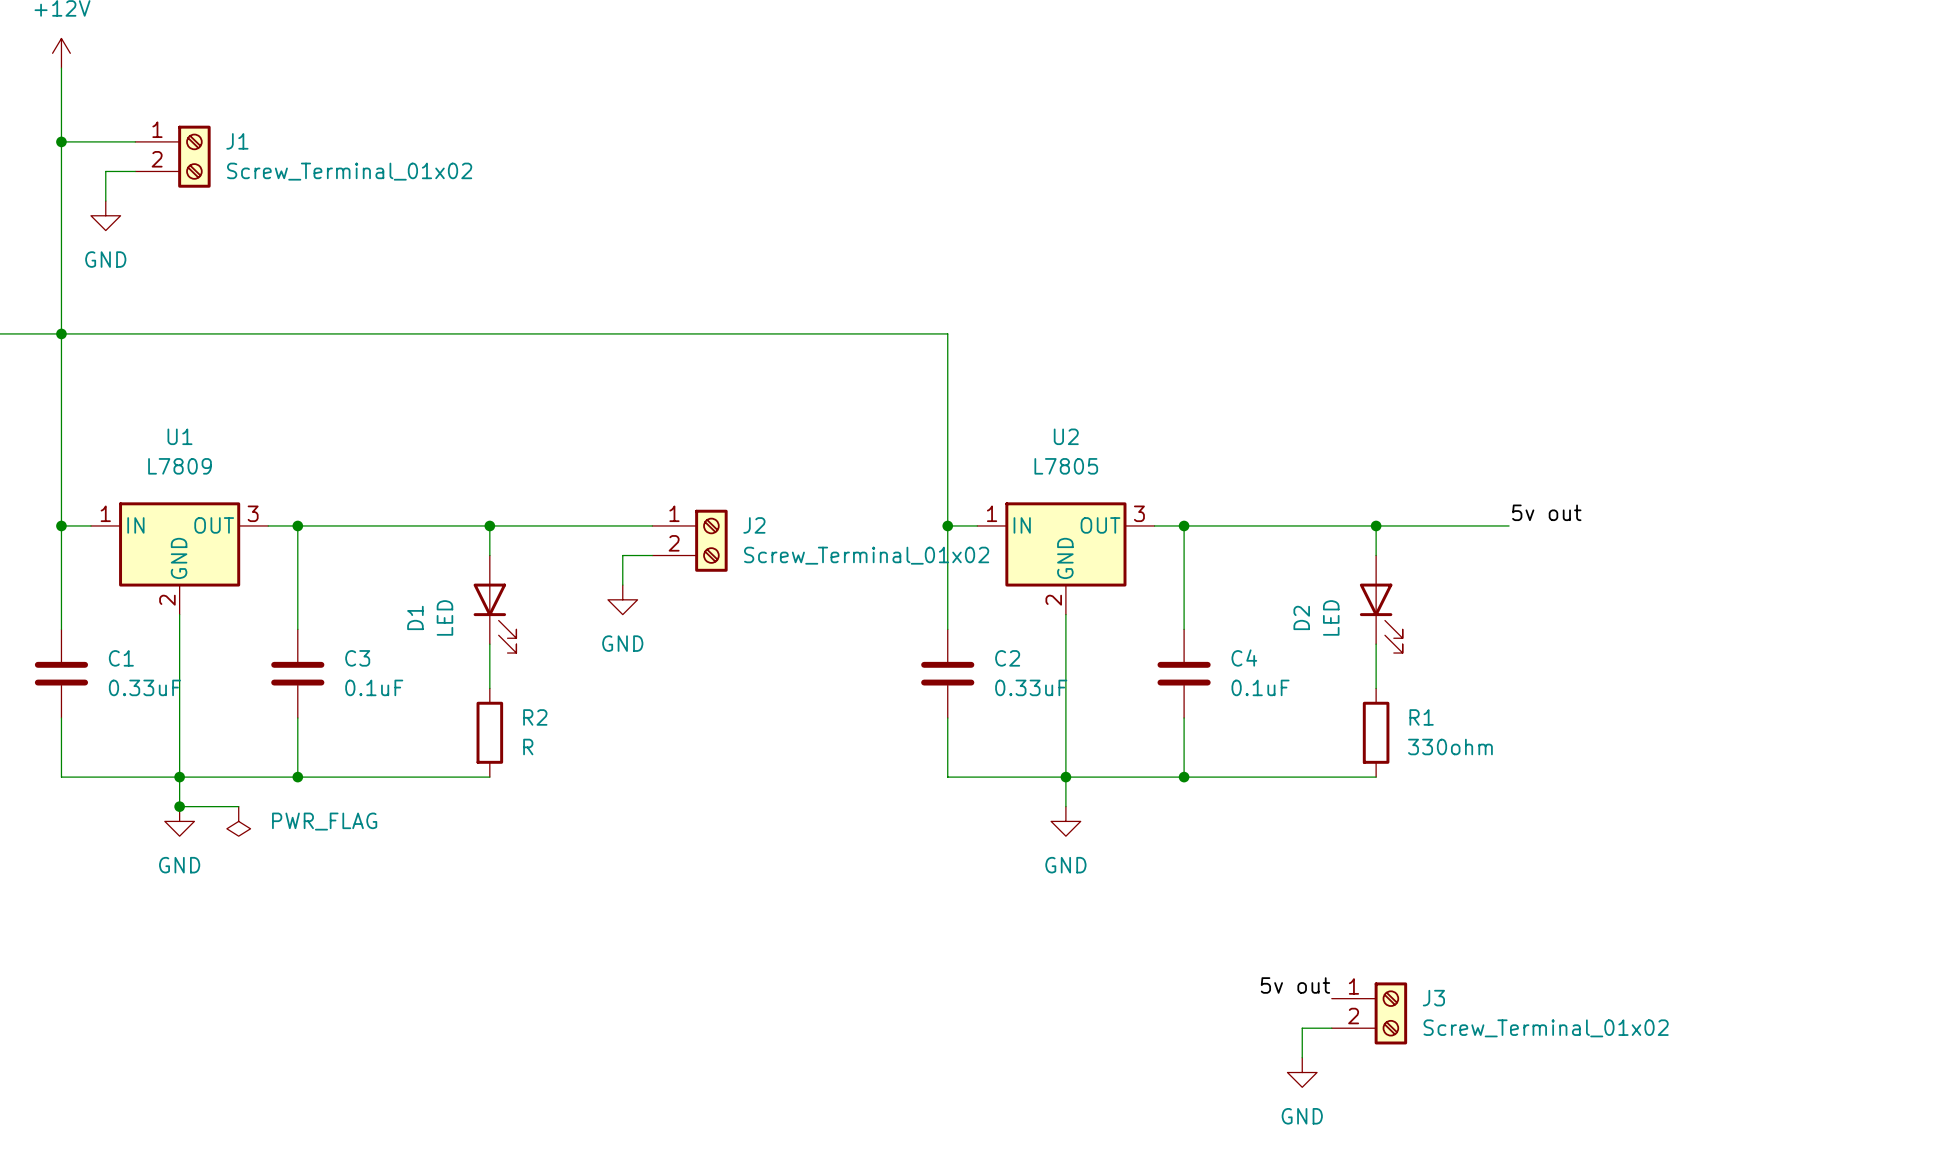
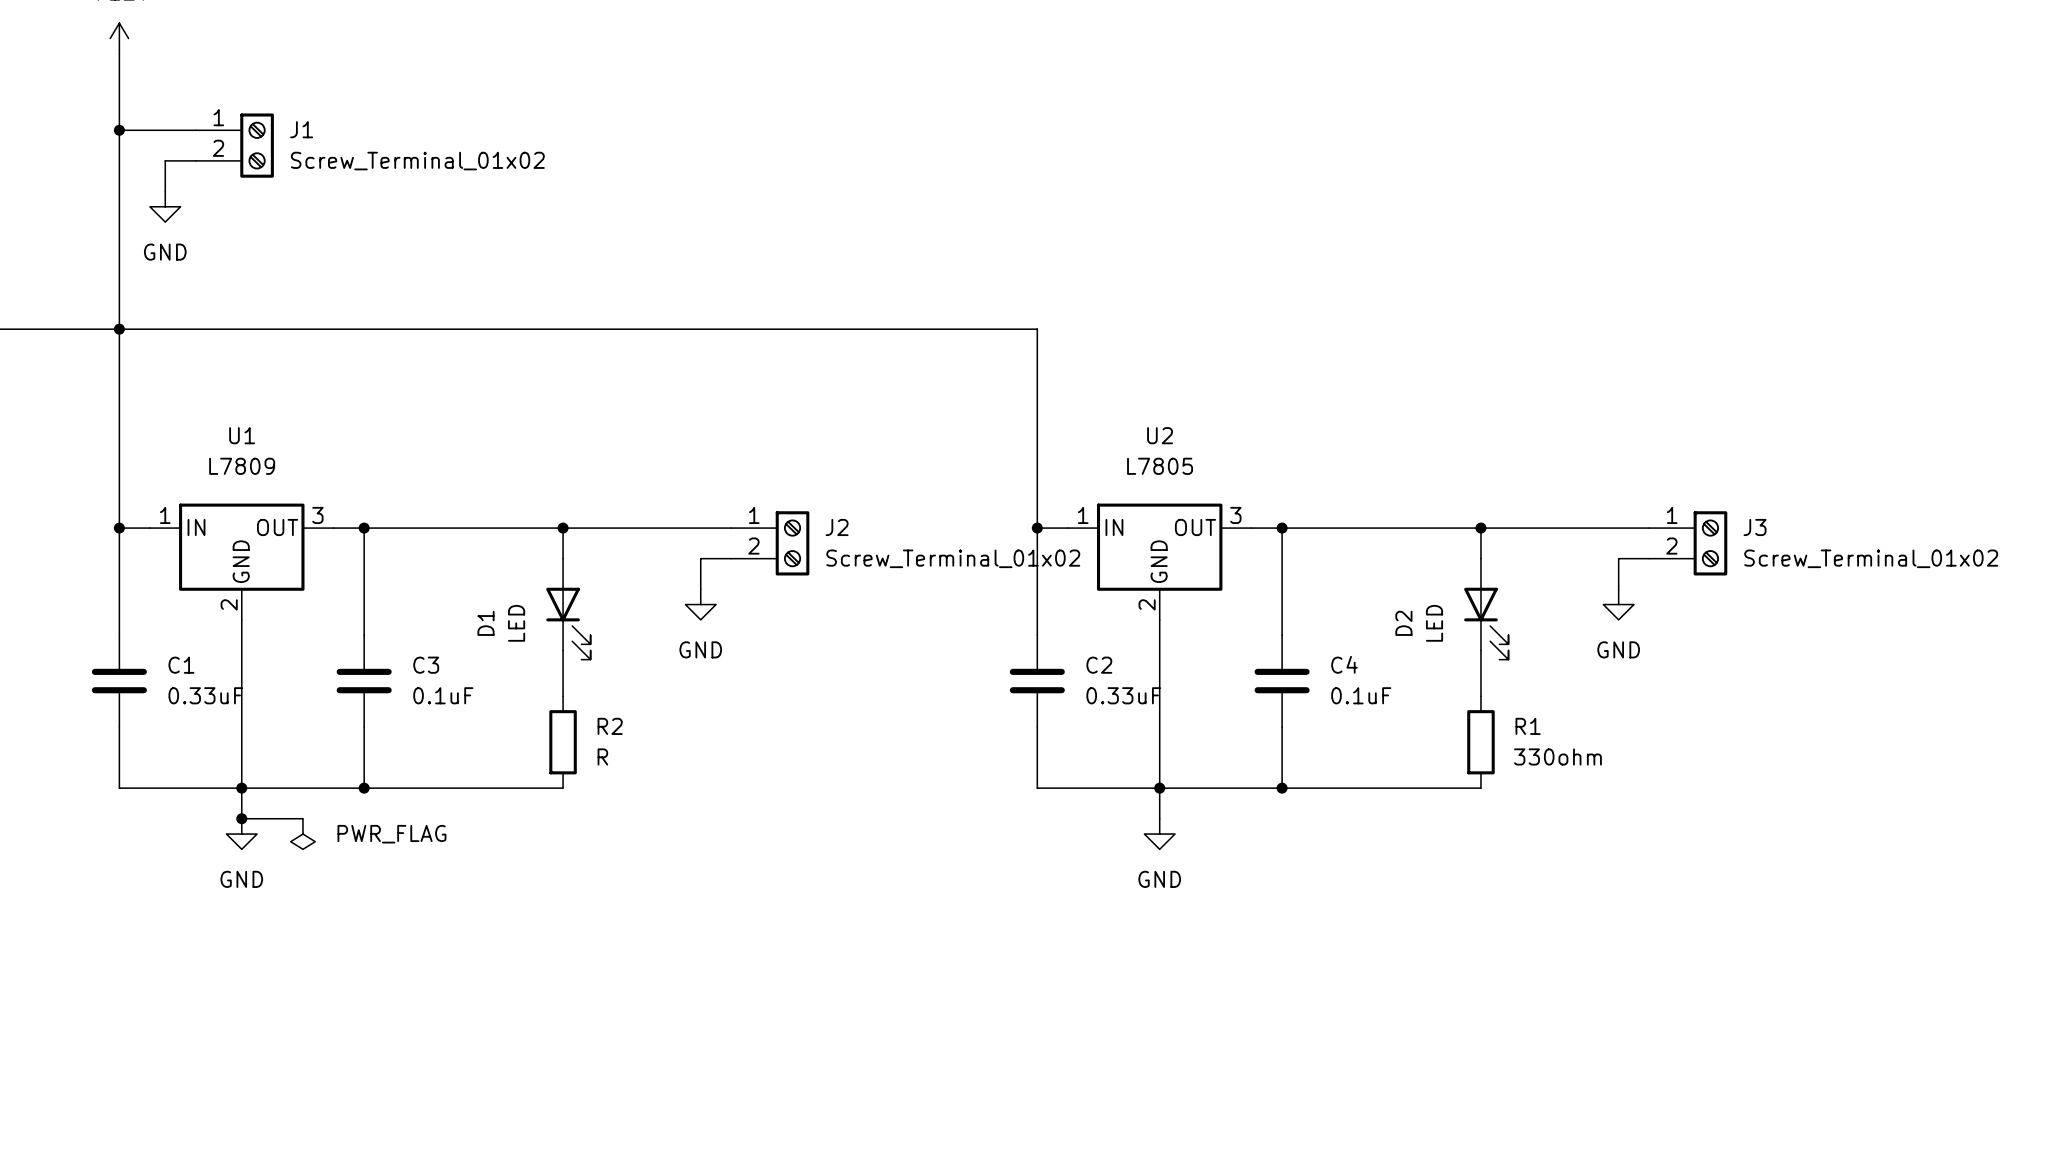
label: 5v out (1546, 512) -> none
wire: none -> (1618, 528) (1649, 528)
wire: none -> (1649, 558) (1618, 558) (1618, 589)
power symbol: none -> GND (1618, 604)
label: 5v out (1295, 985) -> none
J3 position: (1369, 1013) -> (1688, 543)
wire: (1331, 1028) (1302, 1028) (1302, 1057) -> none
power symbol: GND (1302, 1072) -> none

